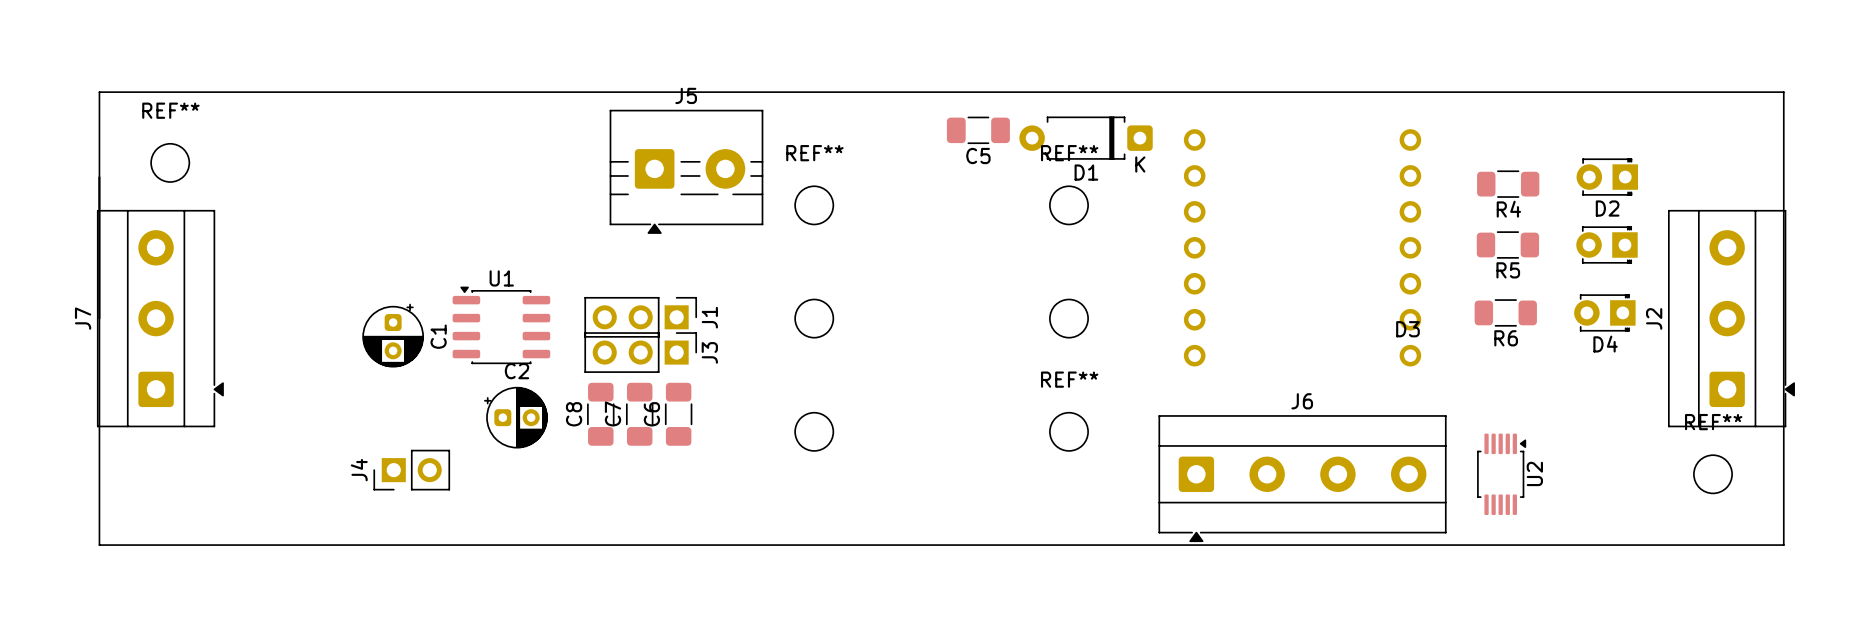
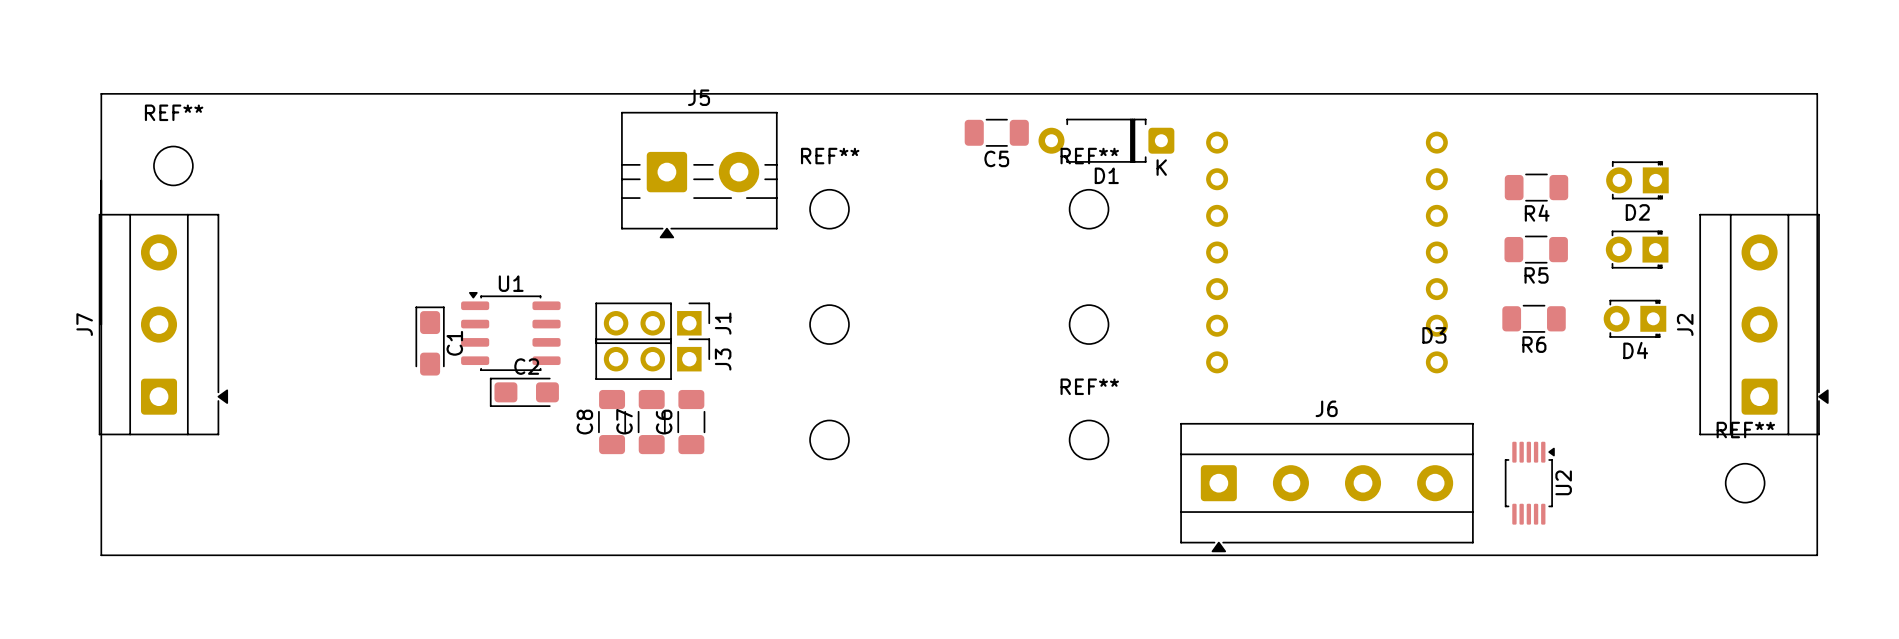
C1 footprint: [362, 303, 425, 368] -> [415, 306, 445, 376]
C2 footprint: [484, 386, 548, 449] -> [489, 377, 559, 407]
J4: (411, 470) -> none

